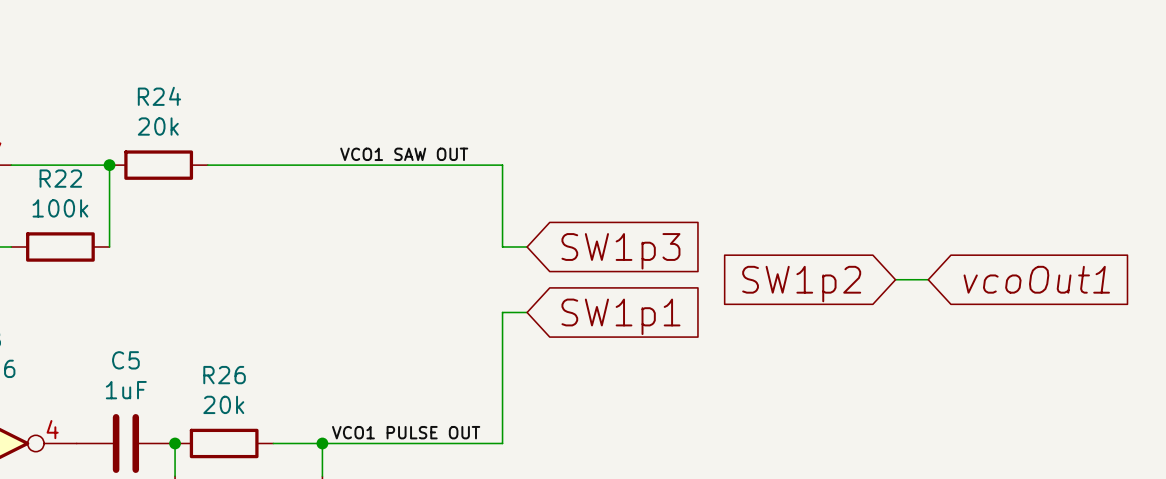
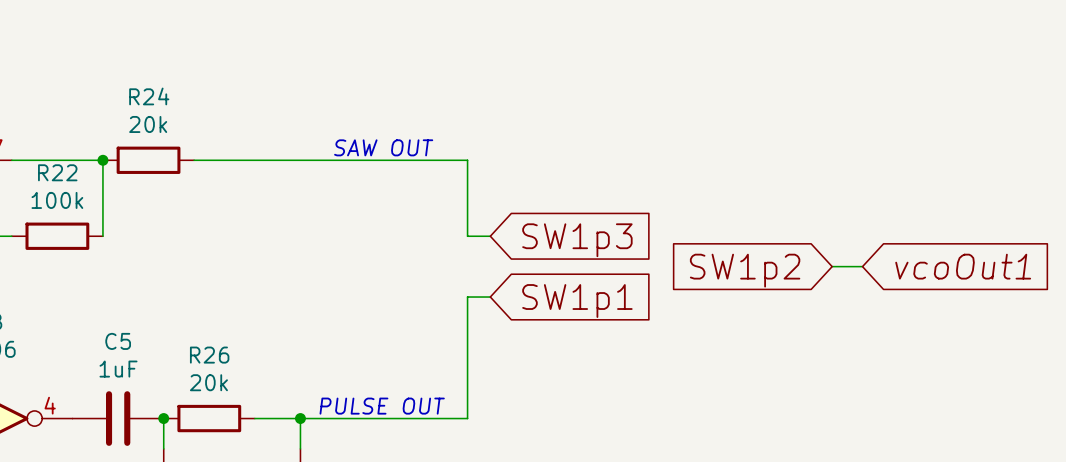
text: none -> SAW OUT (383, 147)
label: VCO1 SAW OUT (404, 154) -> none
text: none -> PULSE OUT (382, 406)
label: VCO1 PULSE OUT (406, 432) -> none

